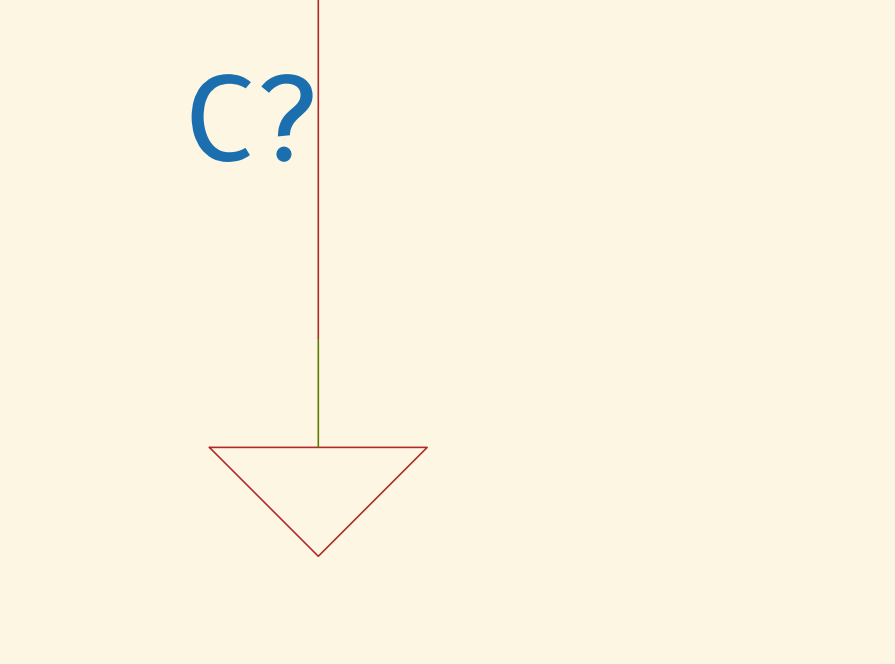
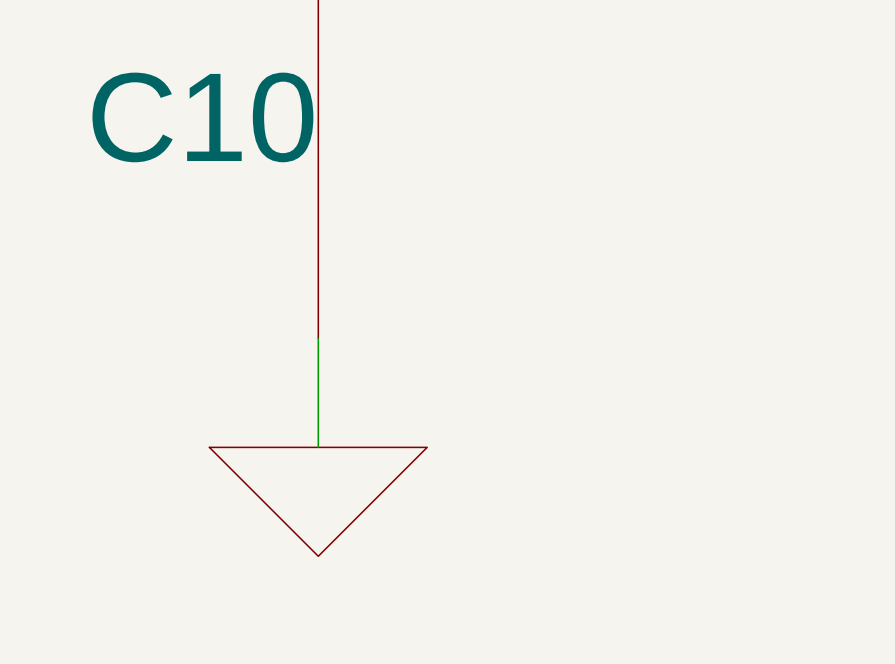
C? name: C? (252, 118) -> C10 (202, 117)

